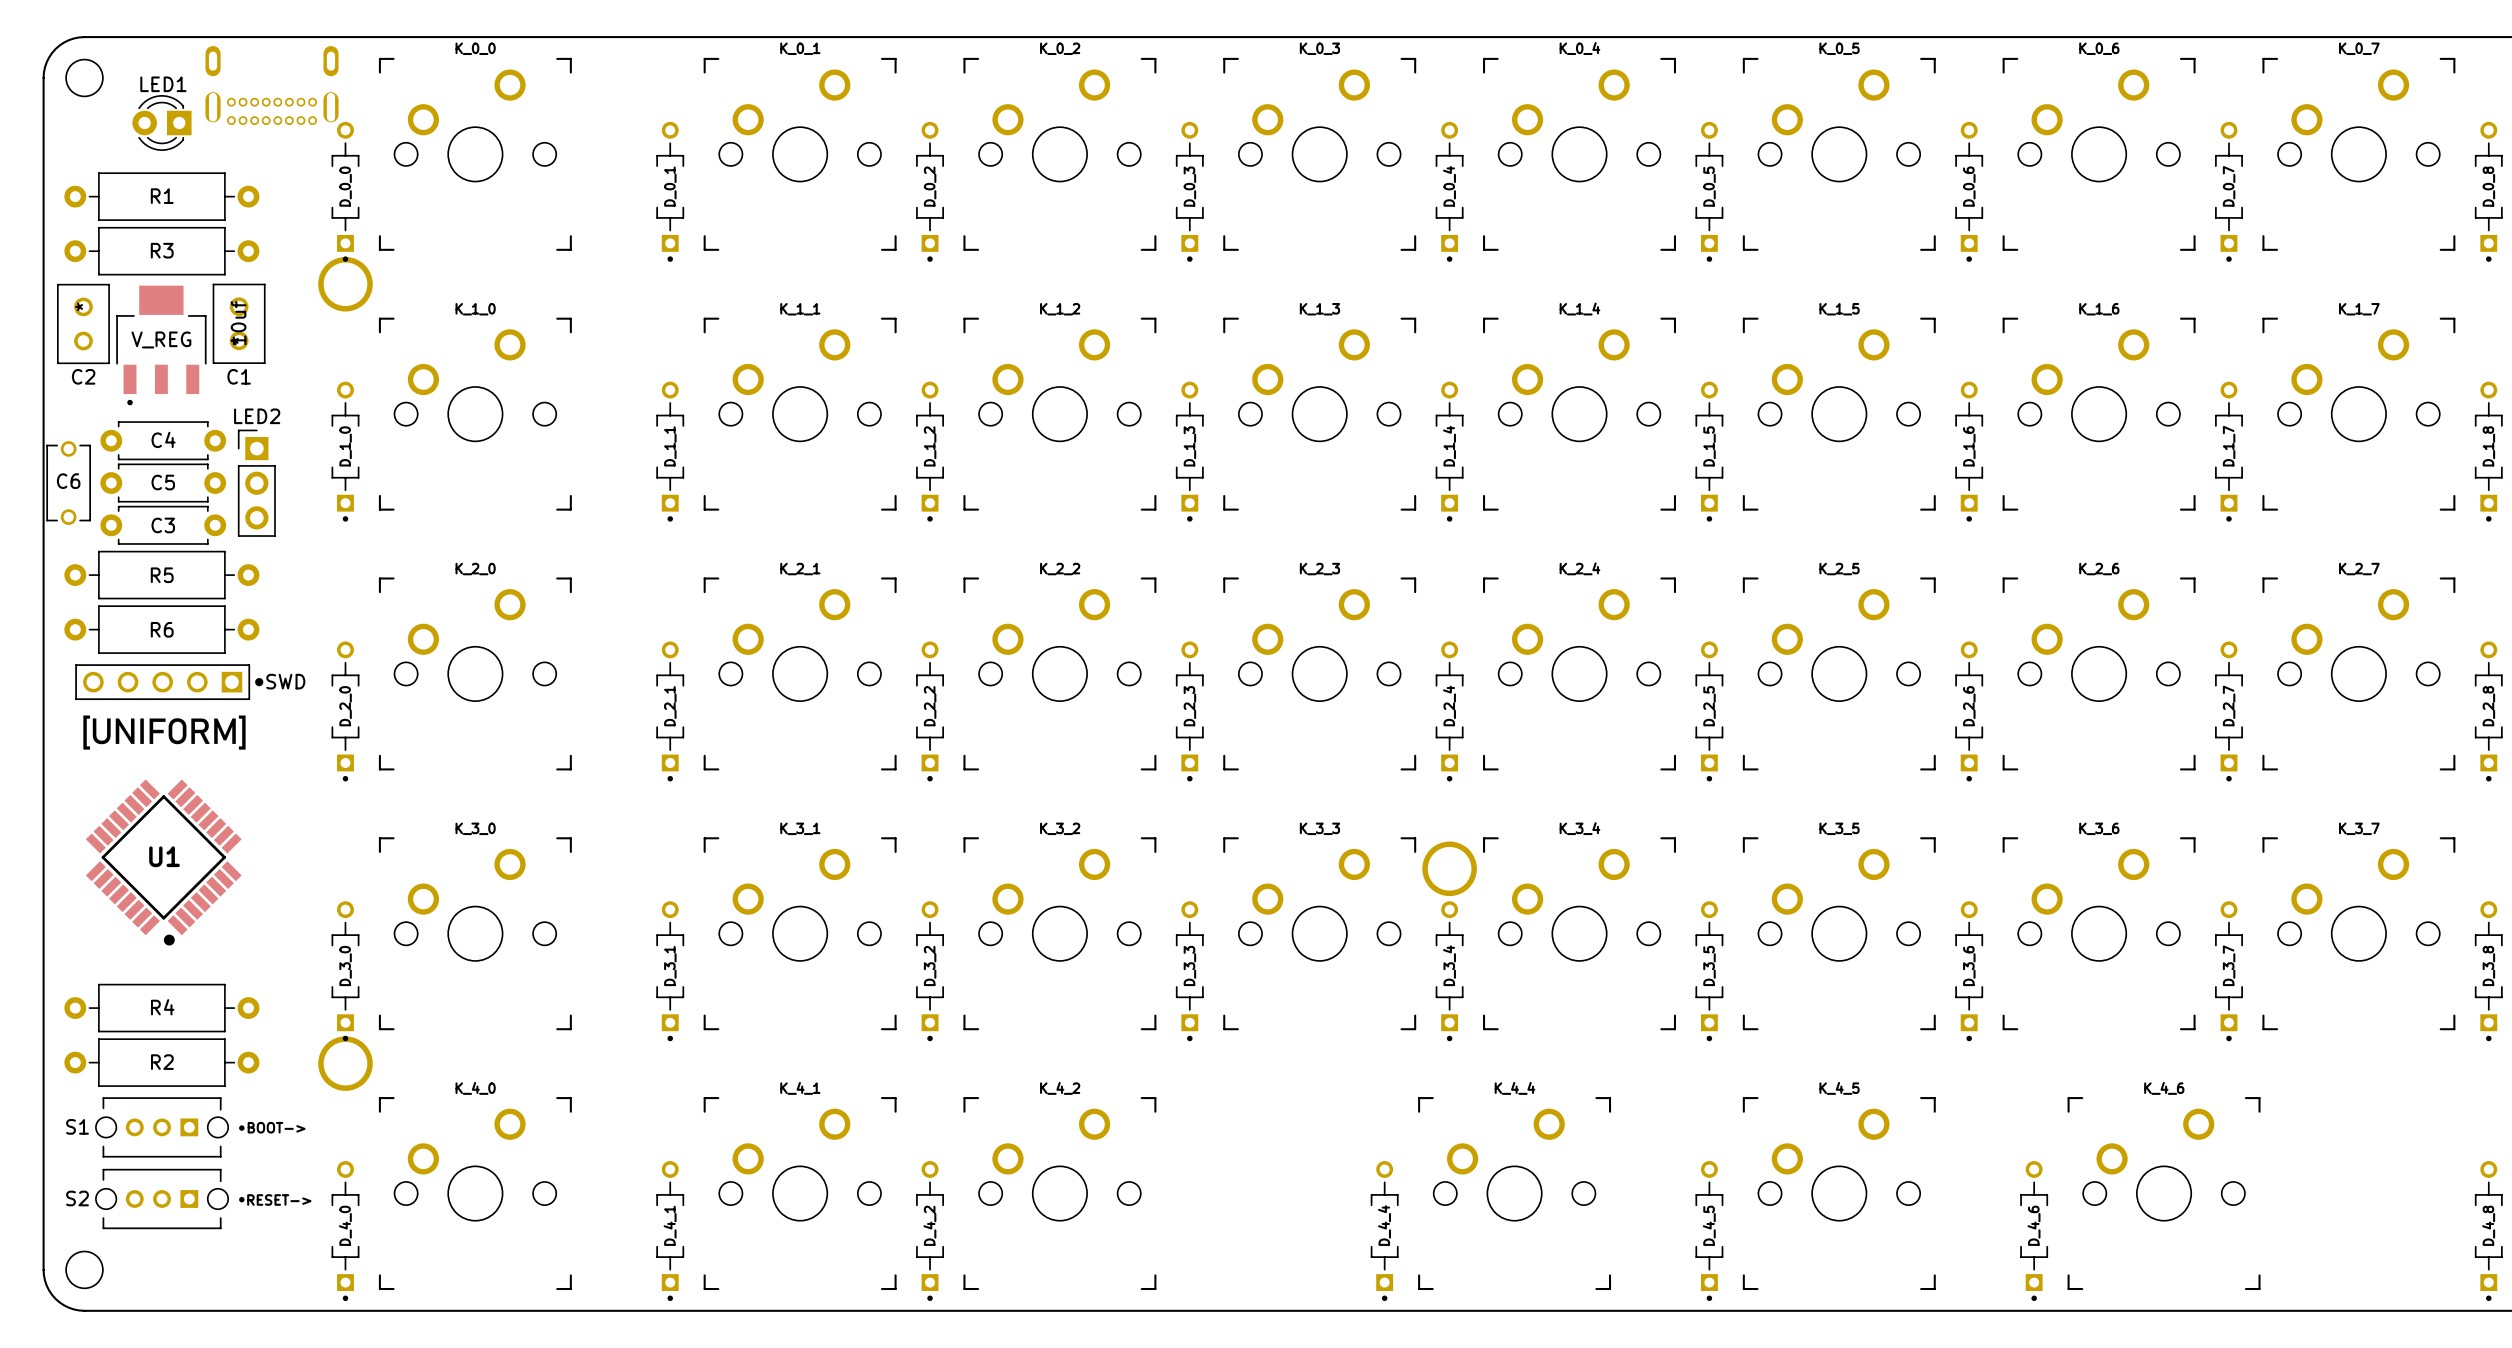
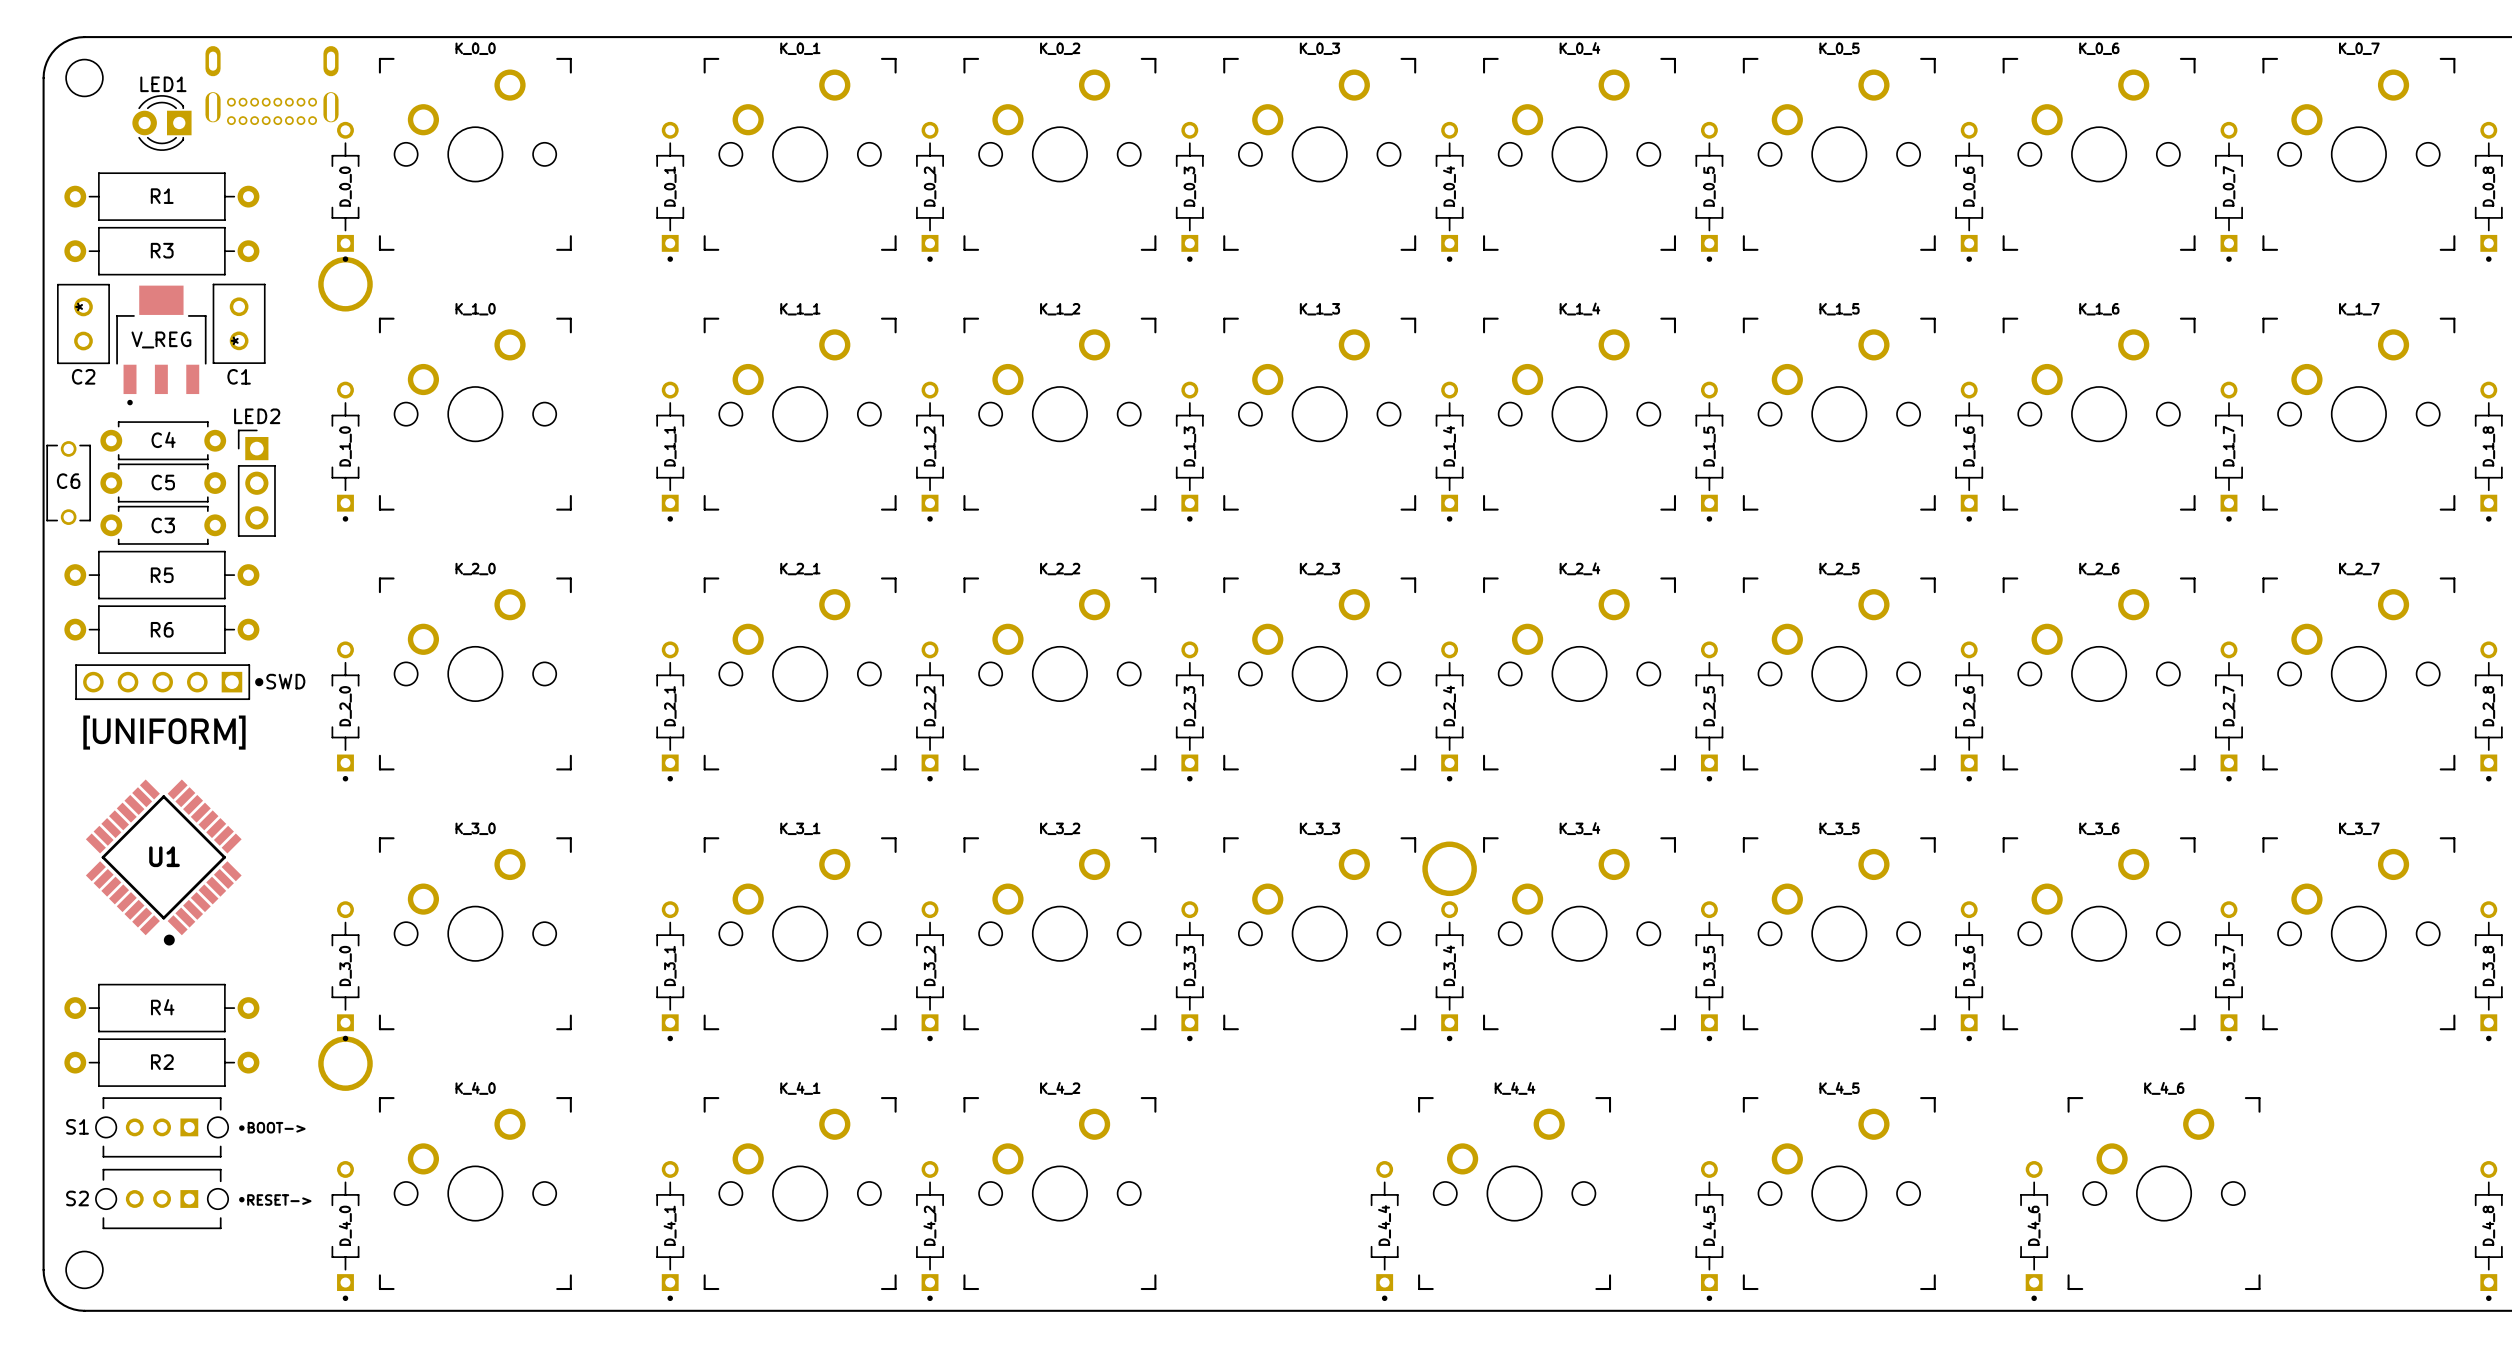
C1 value: 10uf (238, 323) -> none

